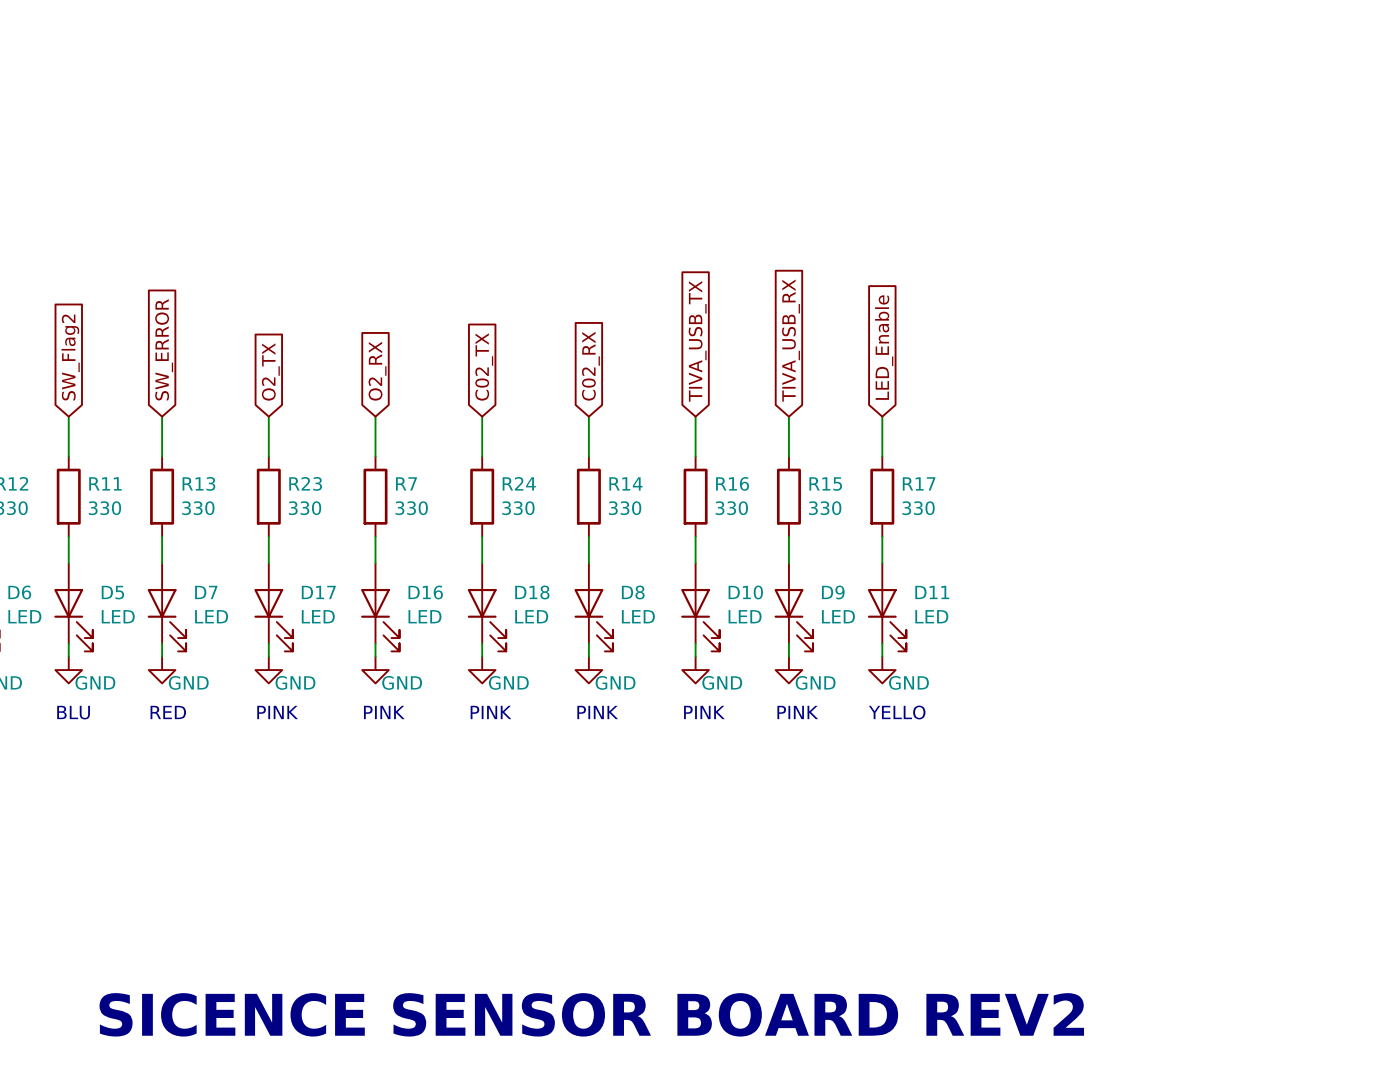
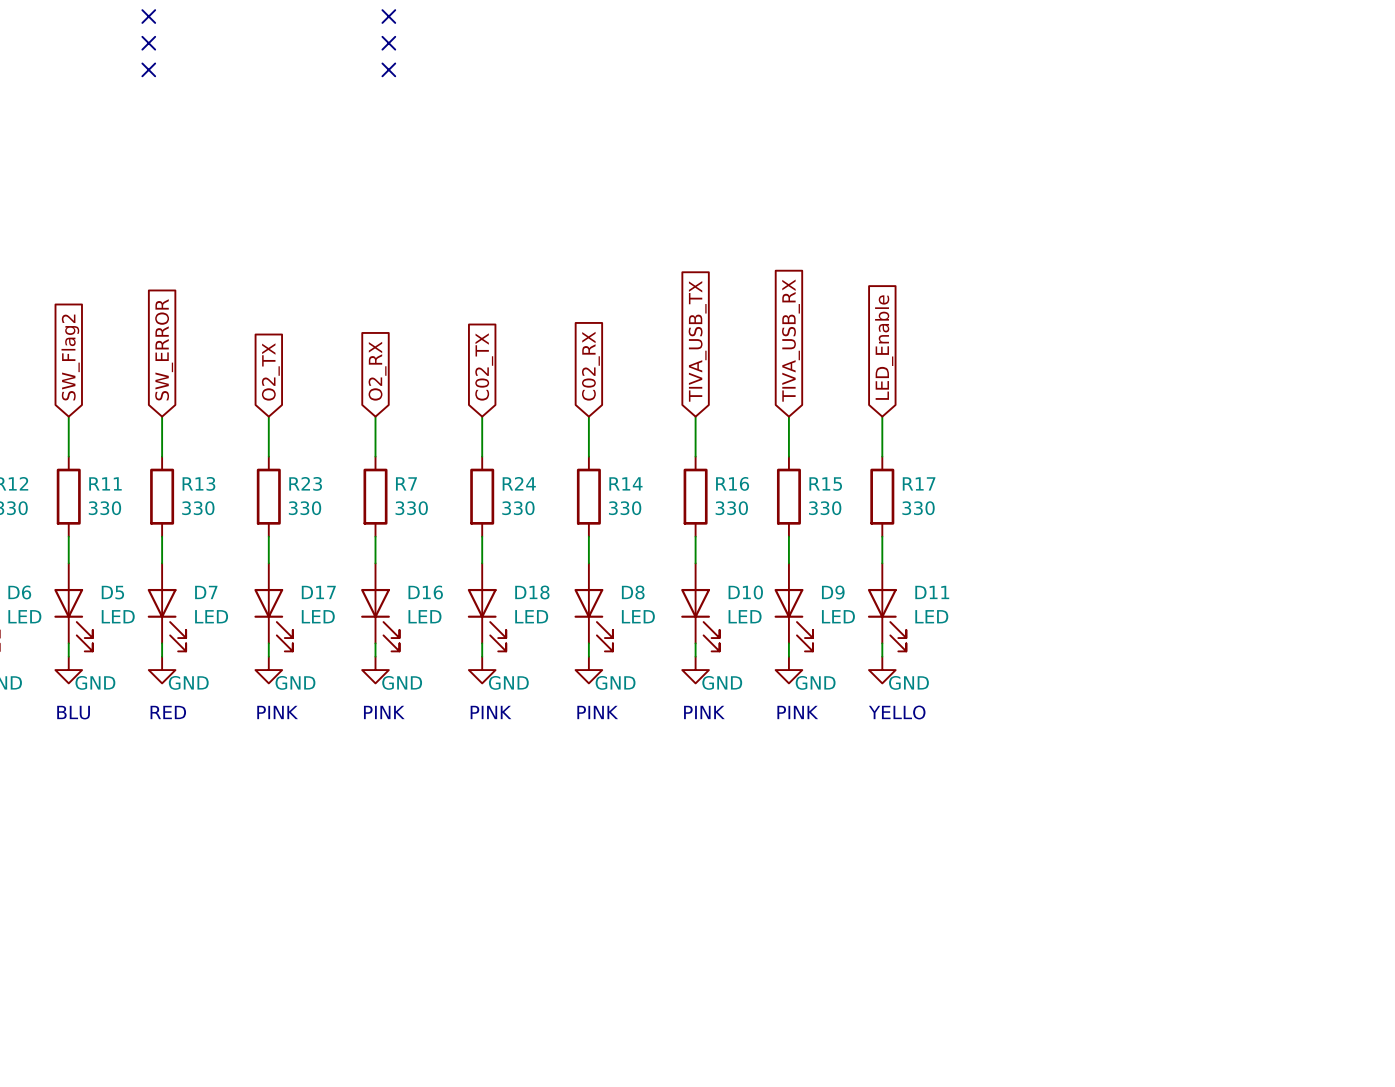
no-connect mark: none -> (148, 16)
no-connect mark: none -> (388, 16)
no-connect mark: none -> (148, 43)
no-connect mark: none -> (388, 43)
no-connect mark: none -> (148, 69)
no-connect mark: none -> (388, 69)
text: SICENCE SENSOR BOARD REV2 (591, 1014) -> none

